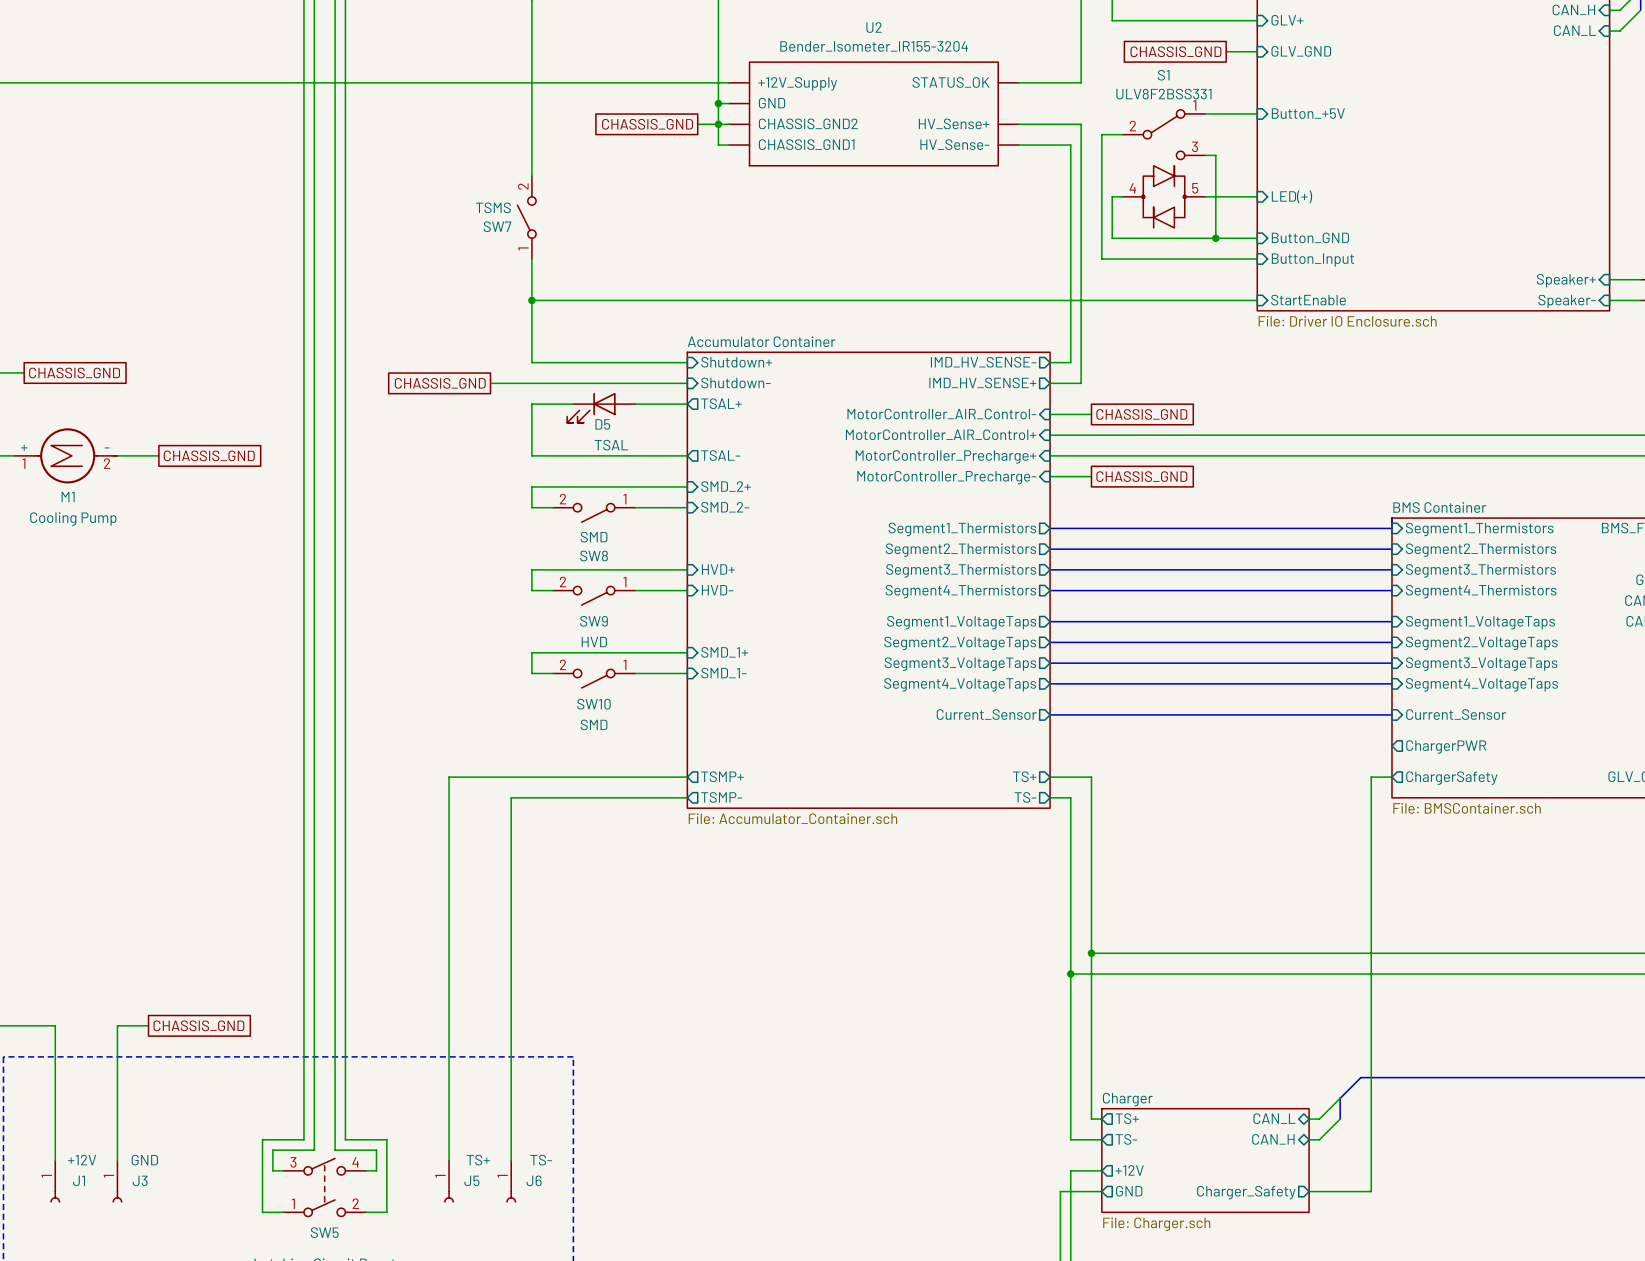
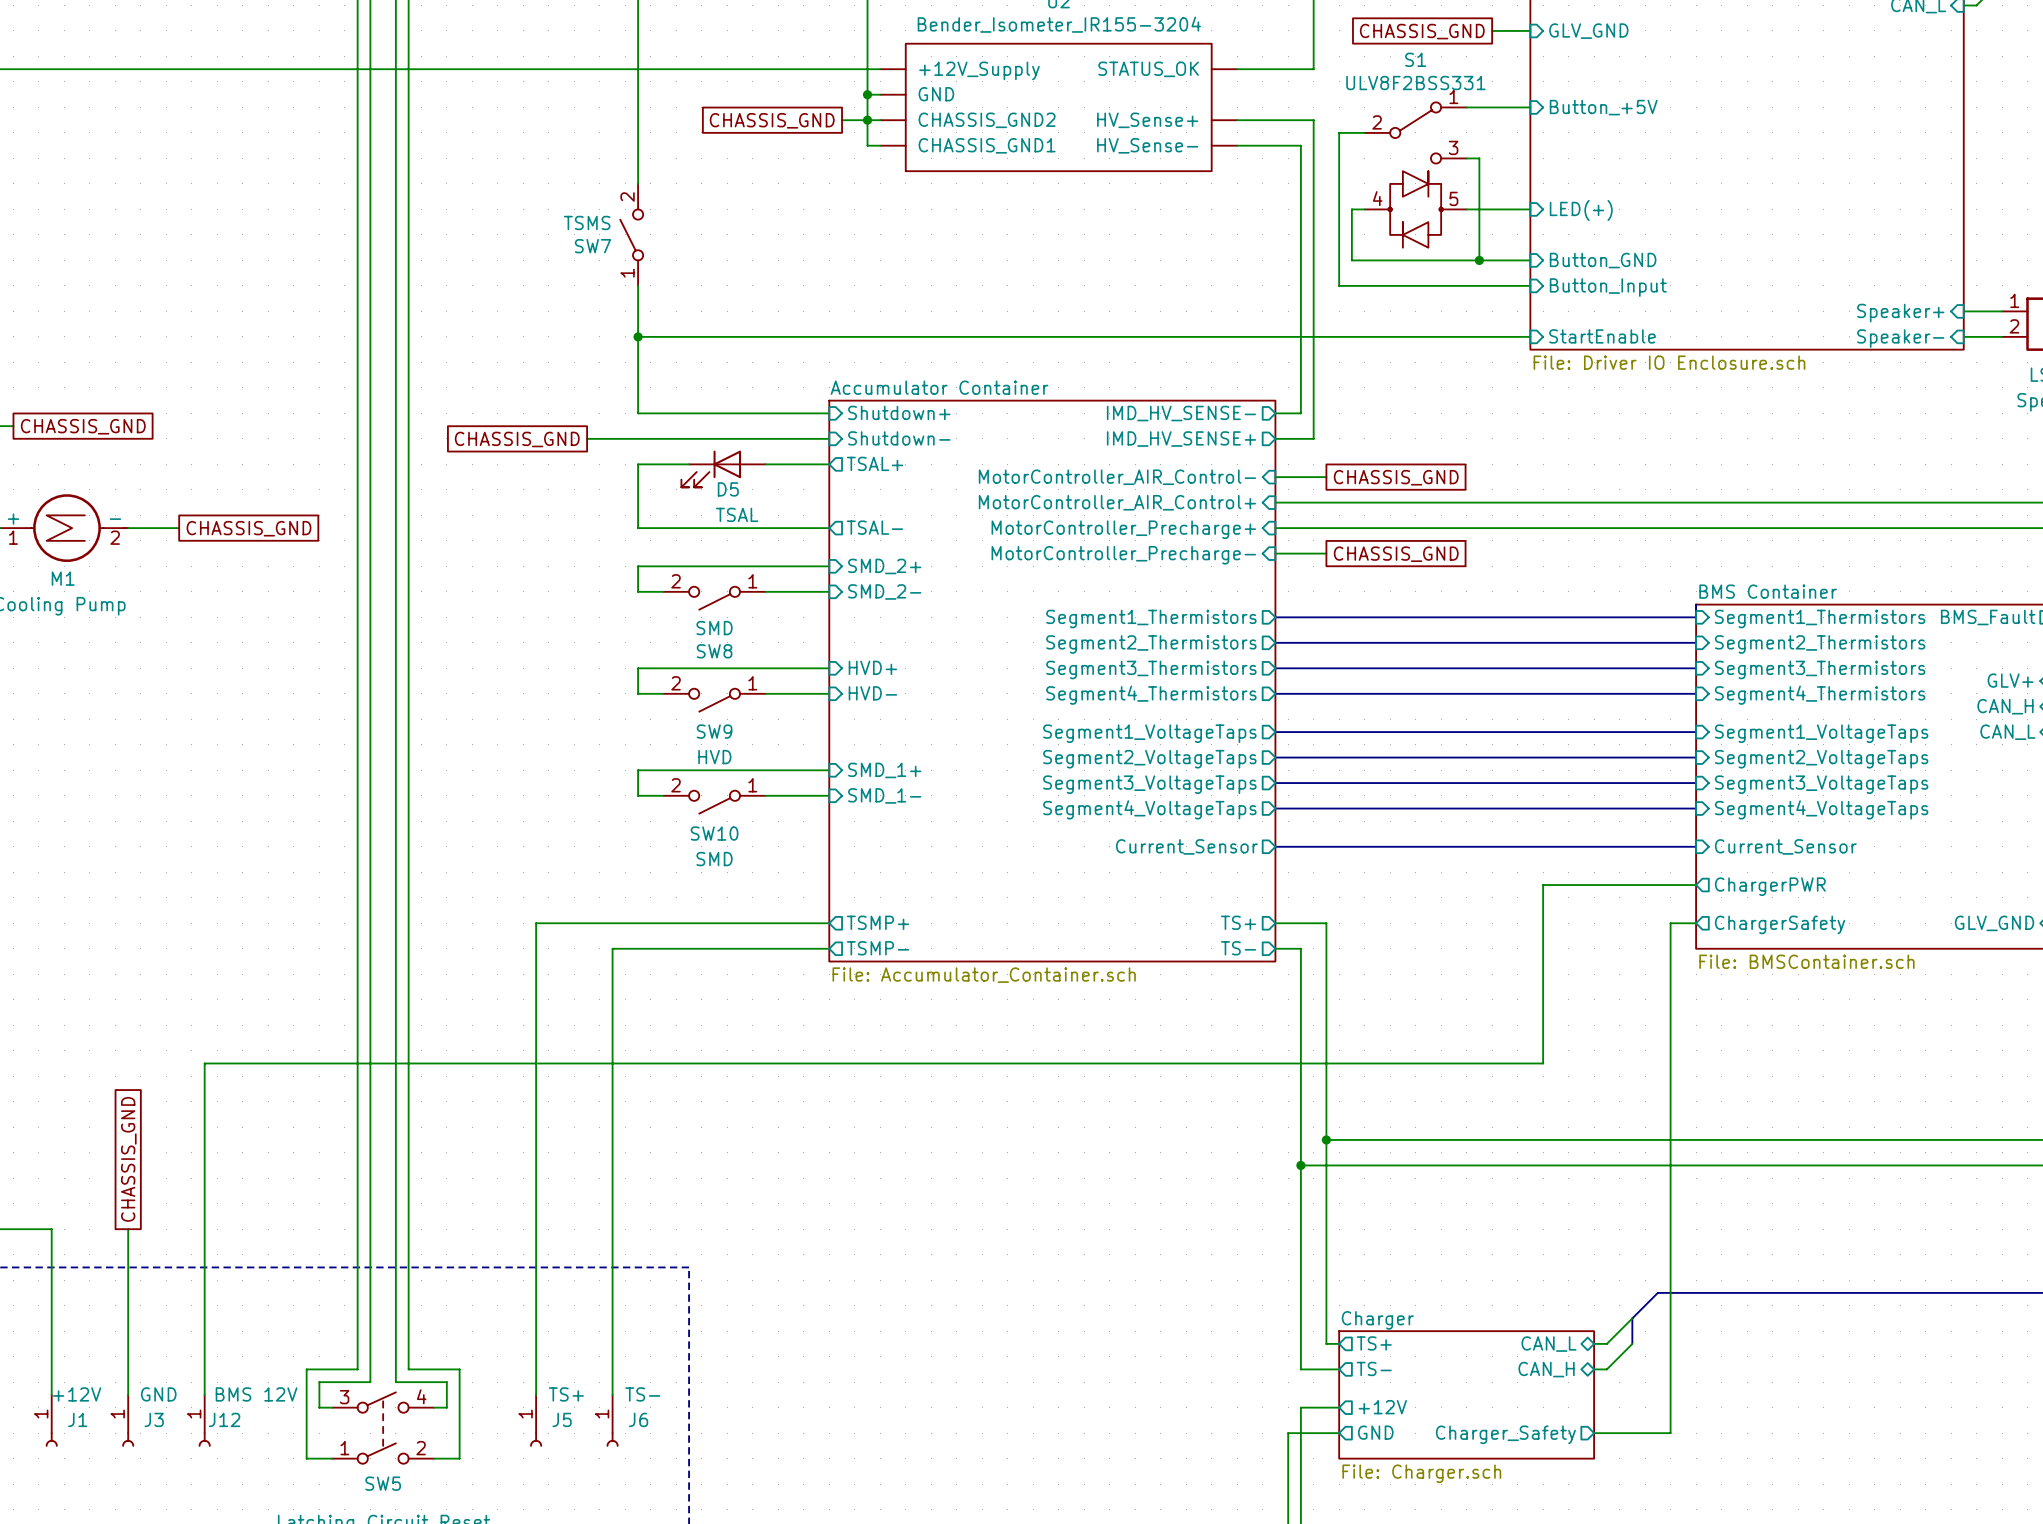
wire: none -> (1696, 885) (1543, 885) (1543, 1063) (204, 1063) (204, 1394)
wire: (117, 1025) (148, 1025) -> none
global label rotation: 0° (198, 1025) -> 90° counterclockwise (128, 1159)
J12: none -> BMS 12V (204, 1420)

